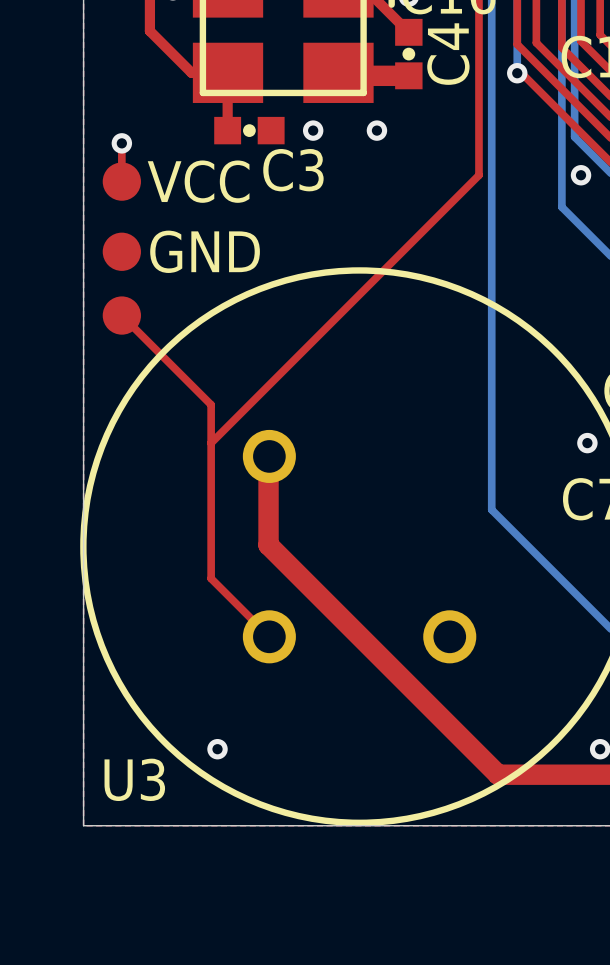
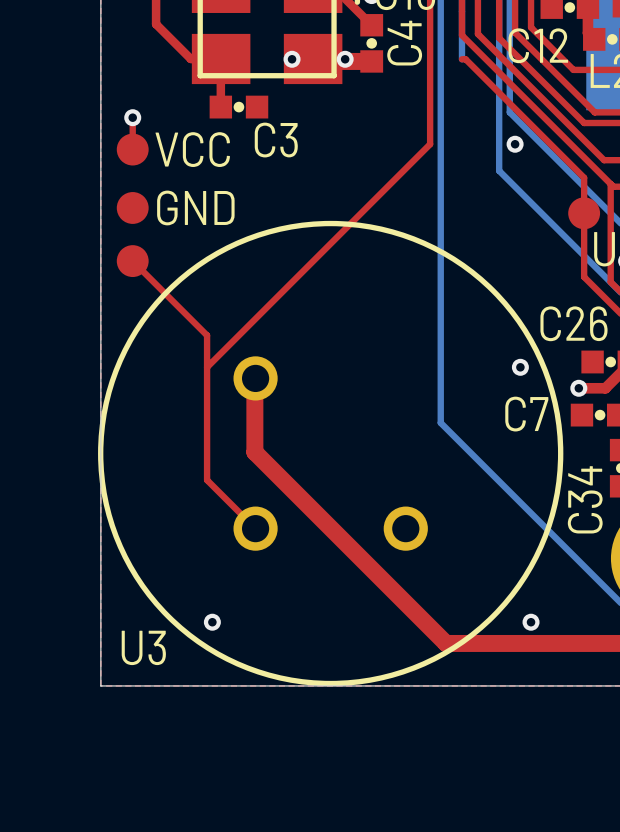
via: none -> (292, 59)
via: none -> (345, 59)
via: (517, 73) -> none
via: (313, 130) -> none
via: (376, 130) -> none

